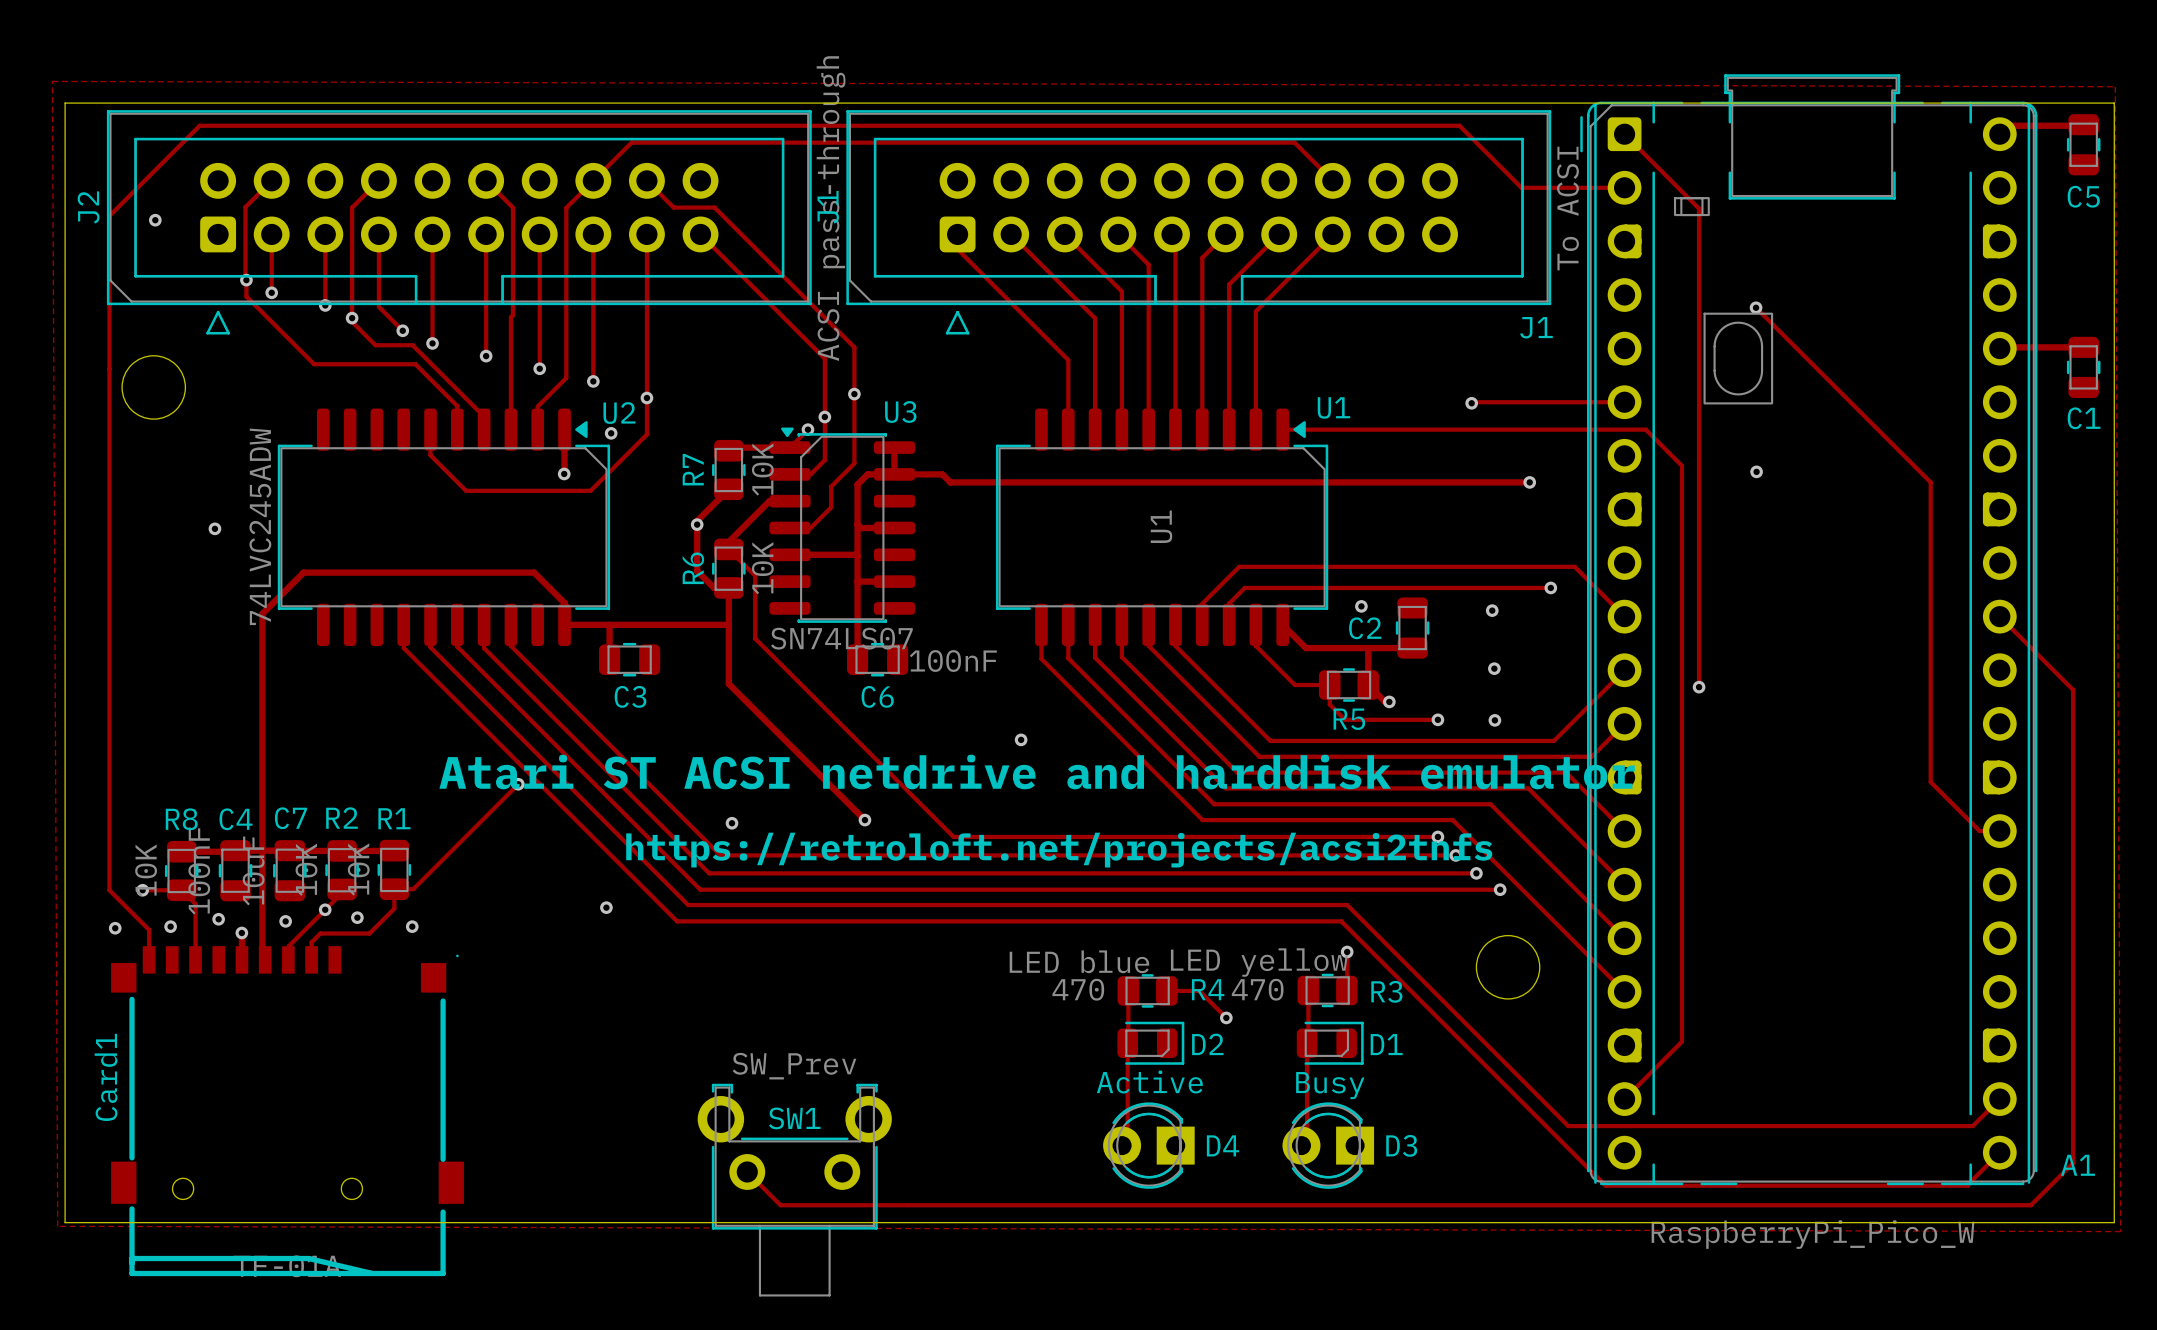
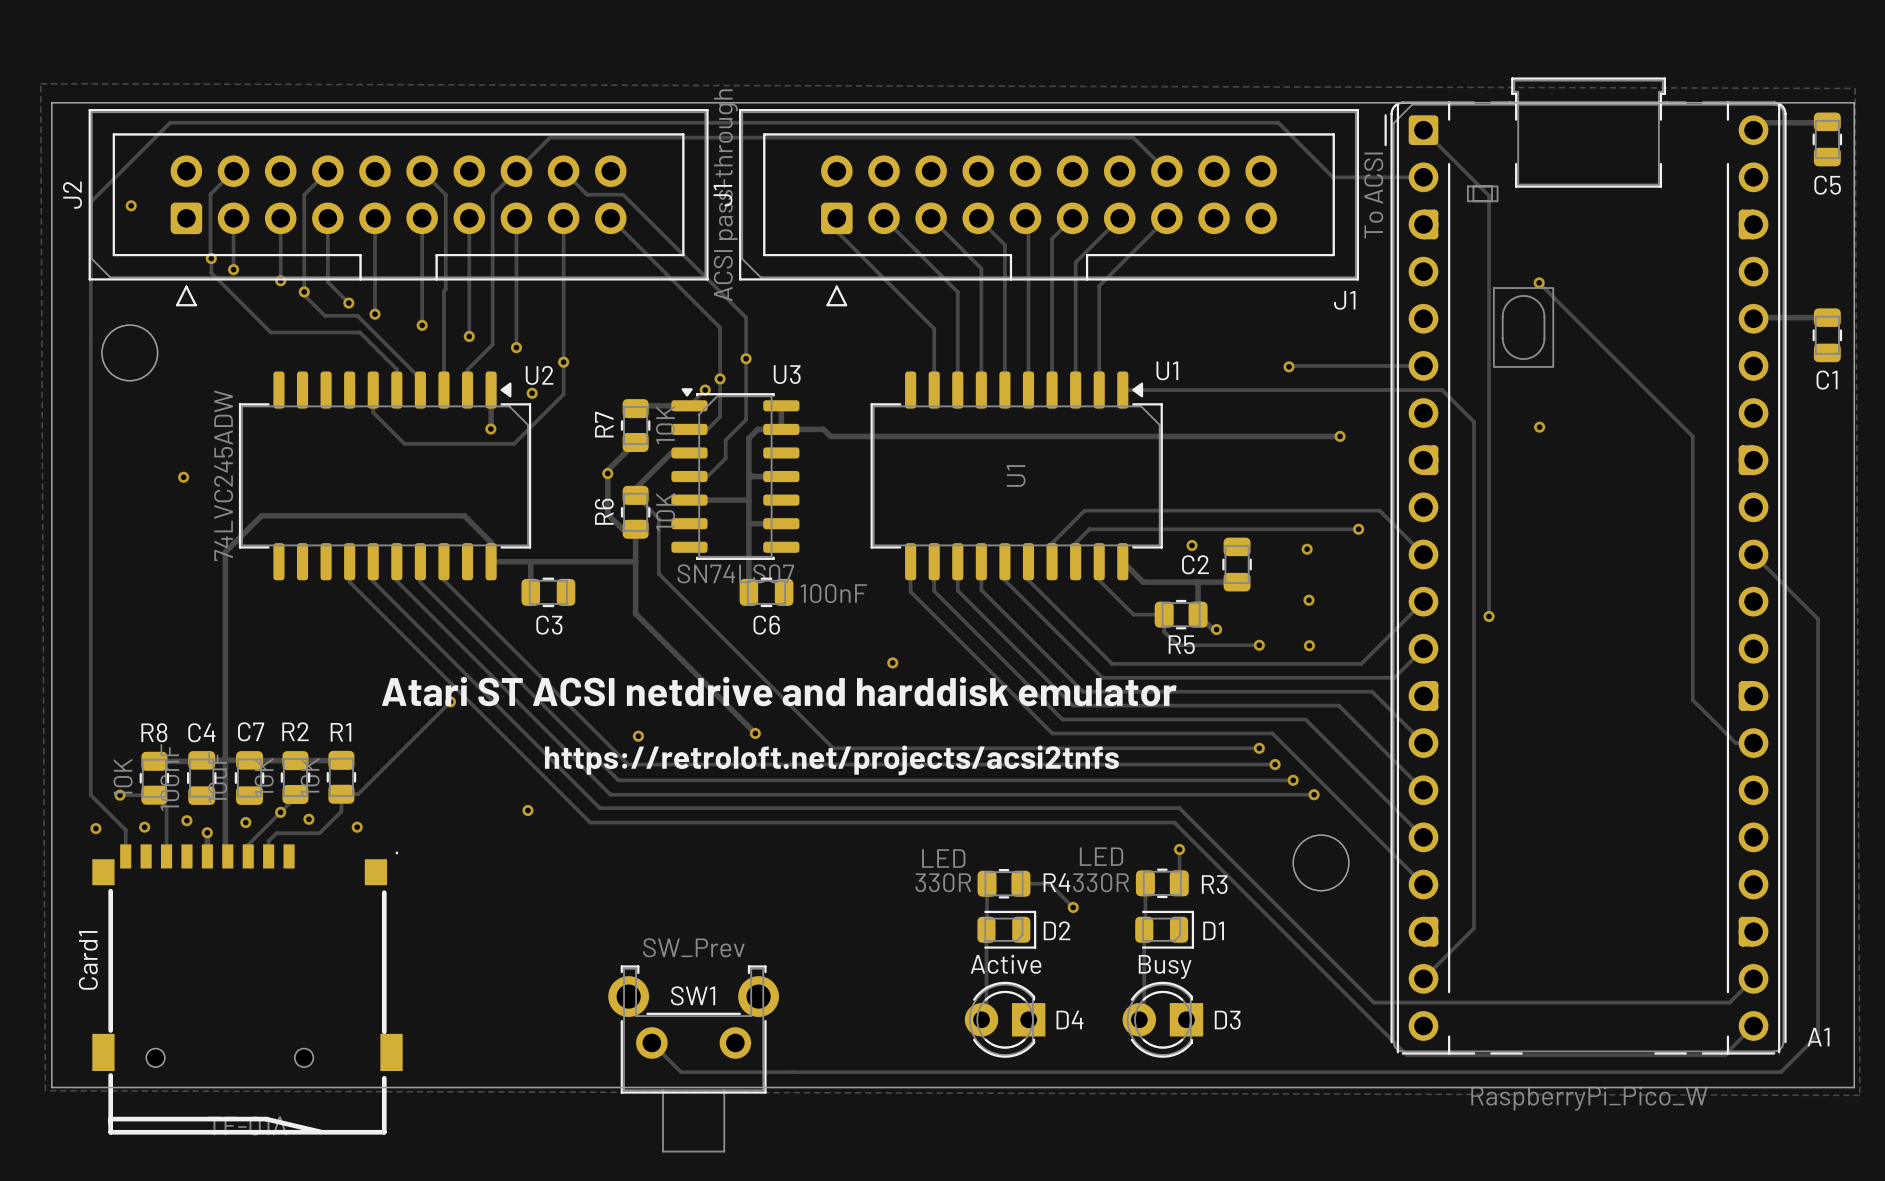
D2 value: LED blue (1079, 961) -> LED (943, 858)
D1 value: LED yellow (1259, 962) -> LED (1101, 856)
R4 value: 470 (1078, 989) -> 330R (943, 882)
R3 value: 470 (1257, 989) -> 330R (1101, 882)

